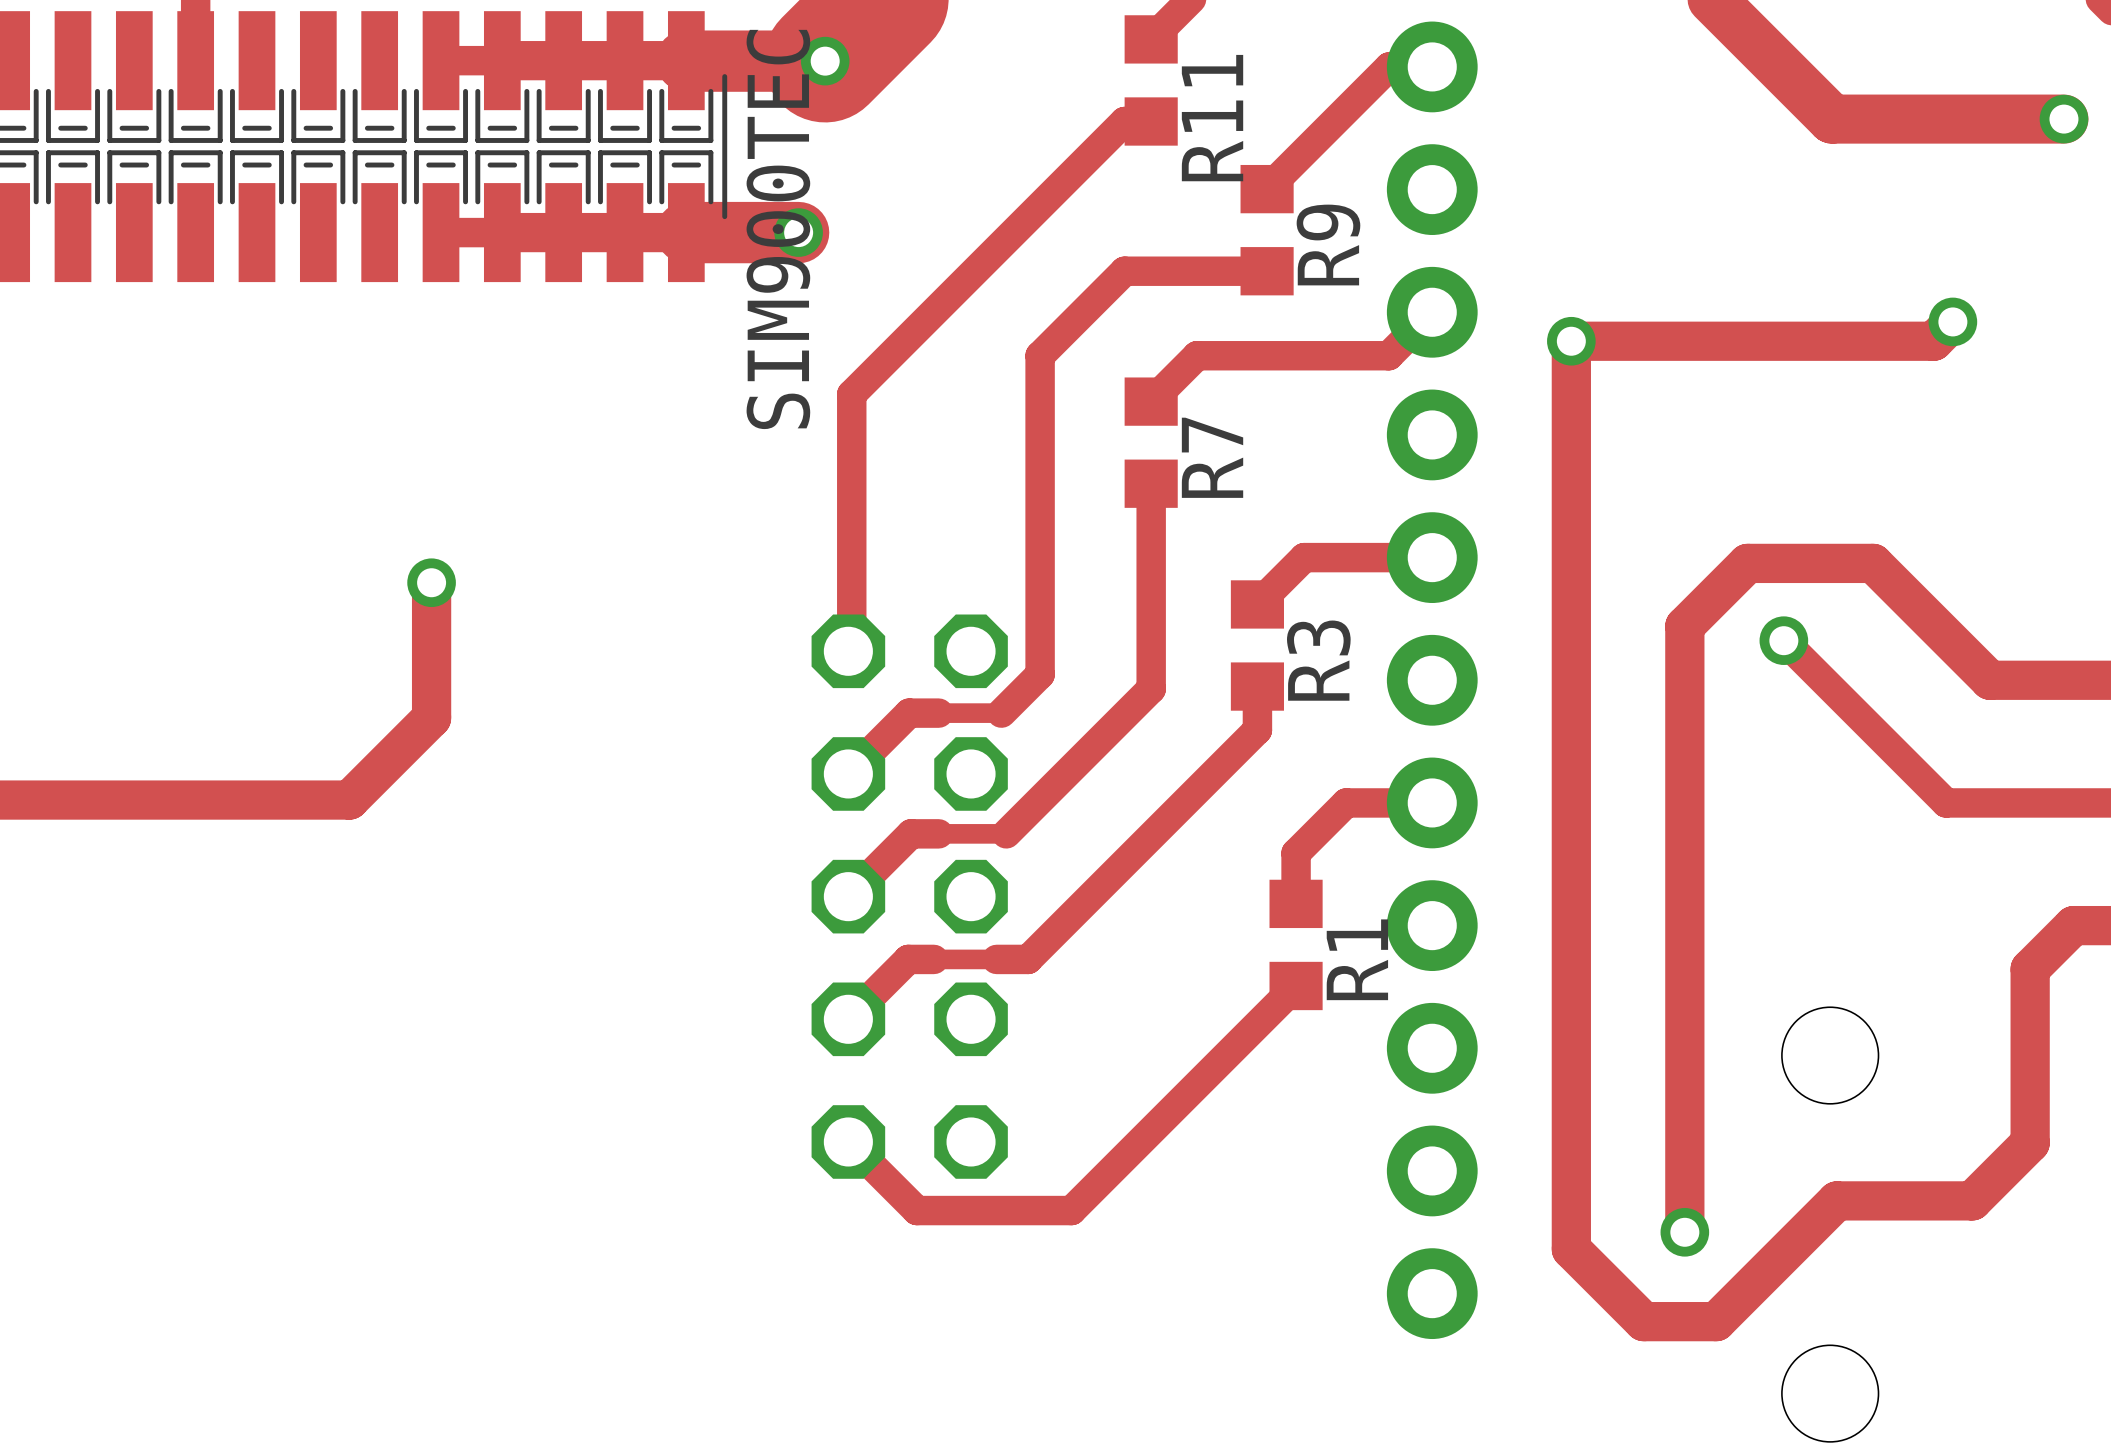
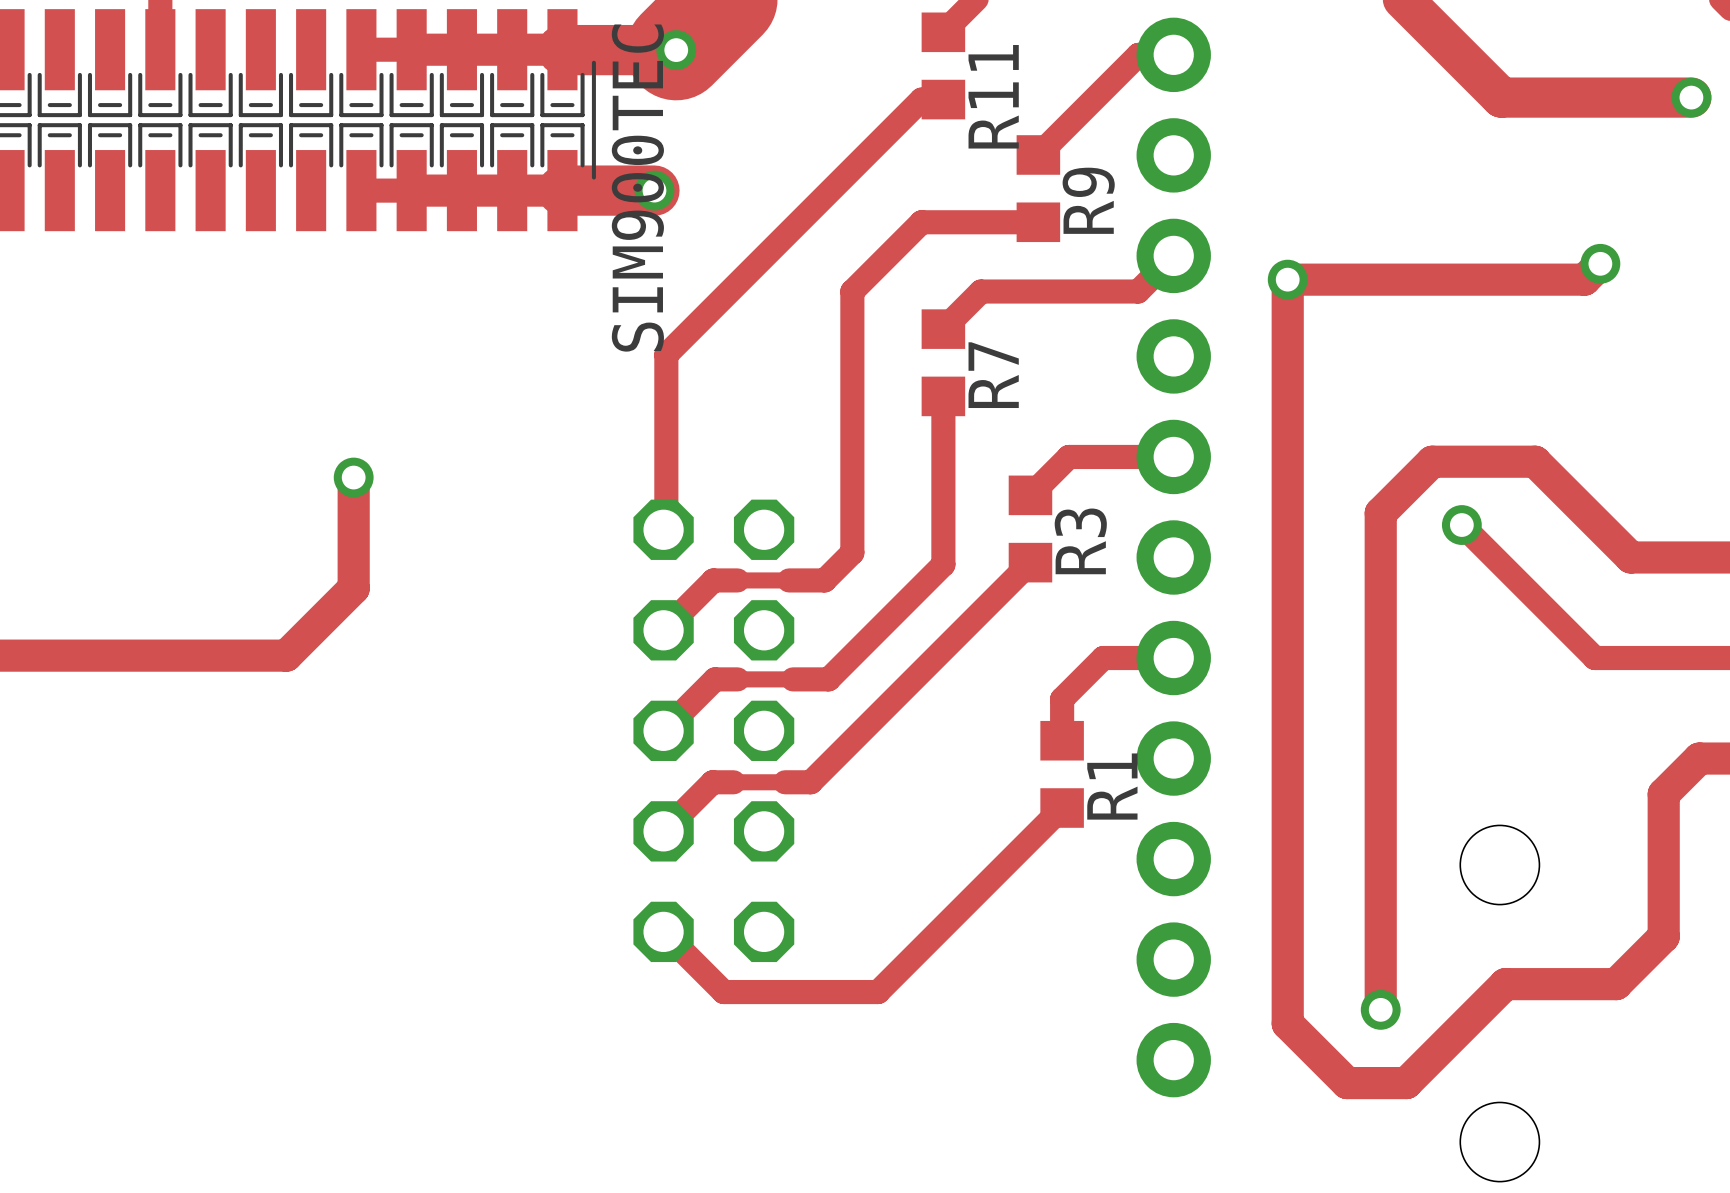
track: (851, 394) (851, 647) (848, 651) -> (698, 323) (666, 354) (666, 527) (663, 529)
track: (1257, 686) (1257, 730) (1028, 959) (908, 959) (848, 1019) -> (1030, 562) (810, 782) (712, 782) (663, 831)
track: (1006, 708) (1001, 713) (909, 713) (848, 773) -> (824, 580) (713, 580) (663, 630)
track: (1011, 829) (1006, 833) (911, 833) (848, 896) -> (828, 679) (715, 679) (663, 730)
part position: (909, 896) -> (713, 730)
track: (848, 1141) (916, 1210) -> (663, 931) (723, 992) (751, 992)

